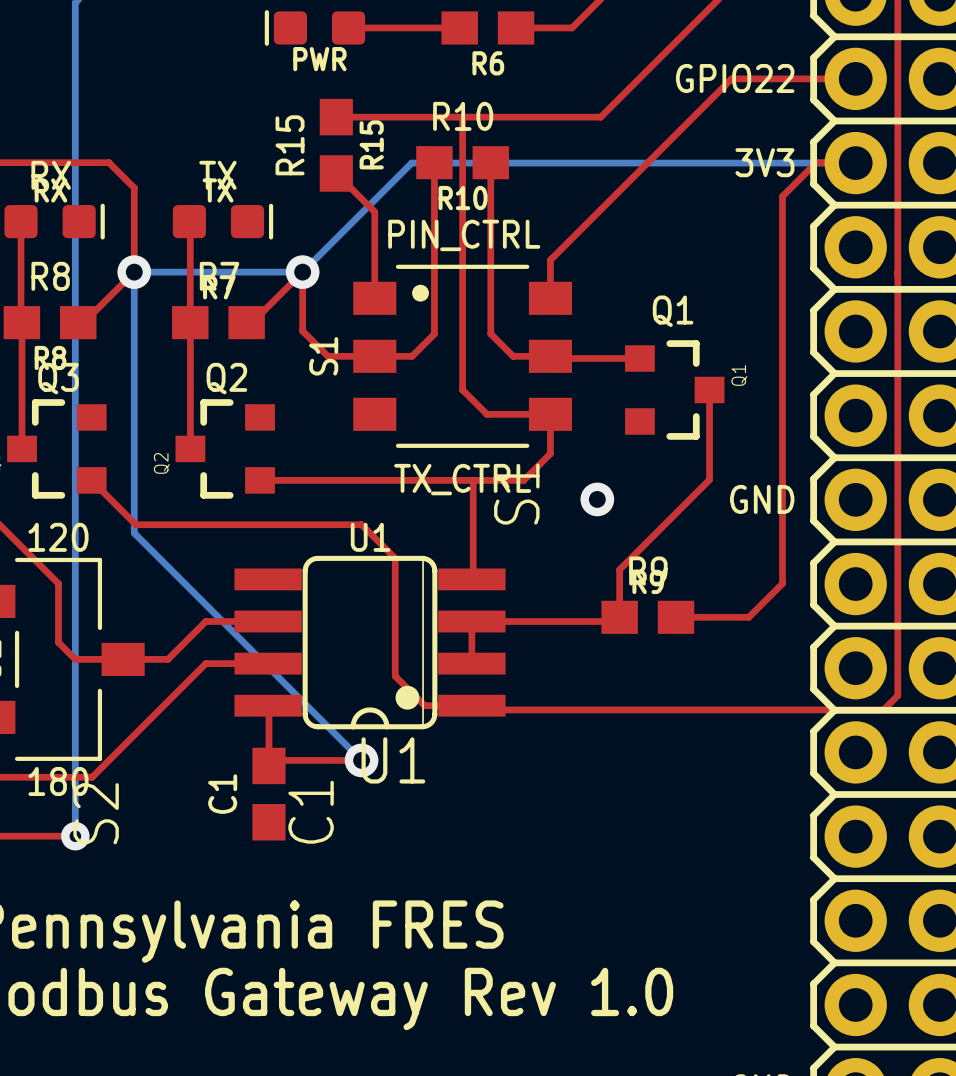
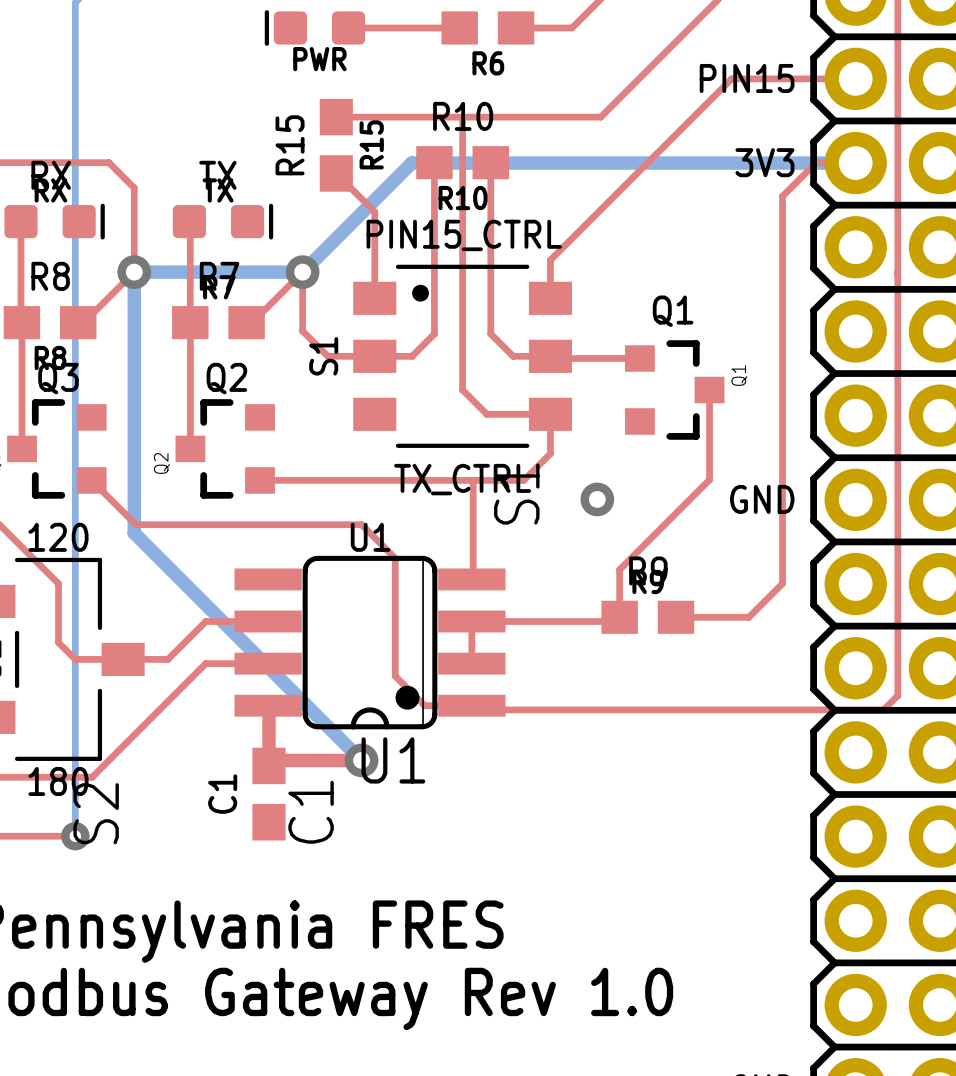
text: GPIO22 (735, 78) -> PIN15 (747, 78)
bottom track width: thin (855, 163) (411, 163) (302, 272) (134, 272) (134, 533) (361, 760) -> thick (855, 163) (411, 163) (302, 272) (134, 272) (134, 533) (361, 760)
text: PIN_CTRL (464, 235) -> PIN15_CTRL (464, 235)
top track width: thin (268, 706) (268, 765) -> thick (268, 706) (268, 765)
top track width: thin (263, 760) (361, 760) -> thick (263, 760) (361, 760)

